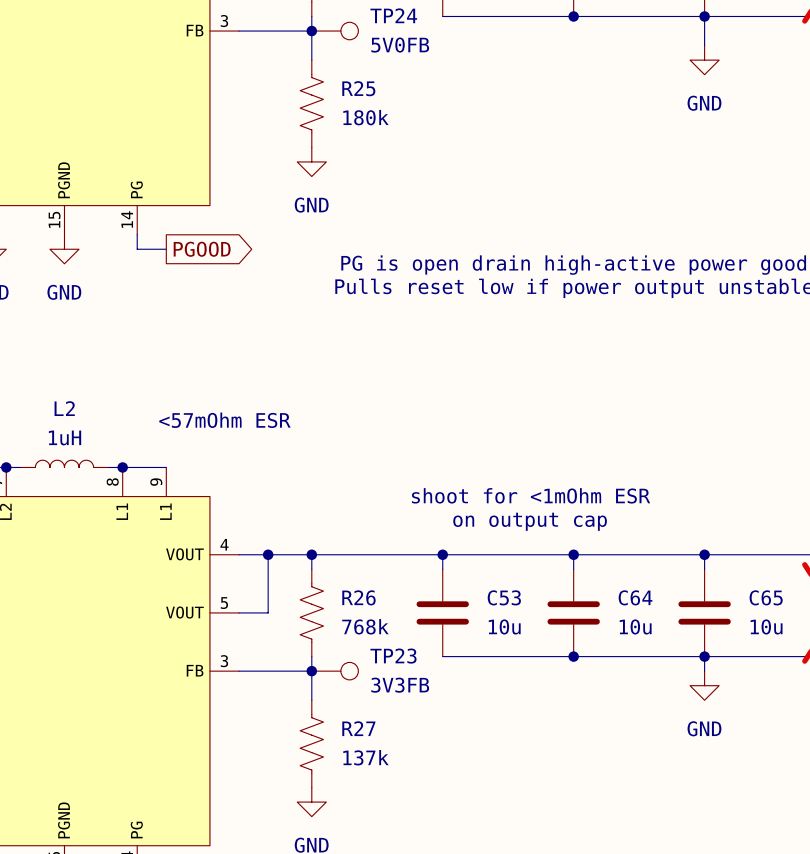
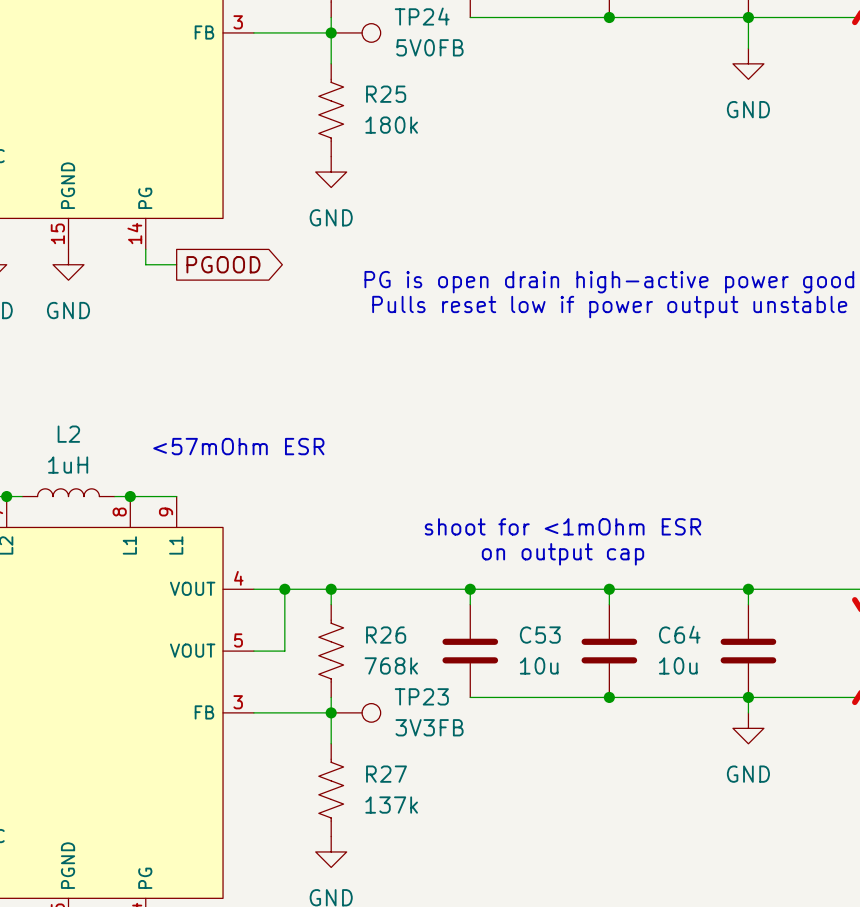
C65 name: C65 (766, 597) -> none
C65 value: 10u (766, 626) -> none

